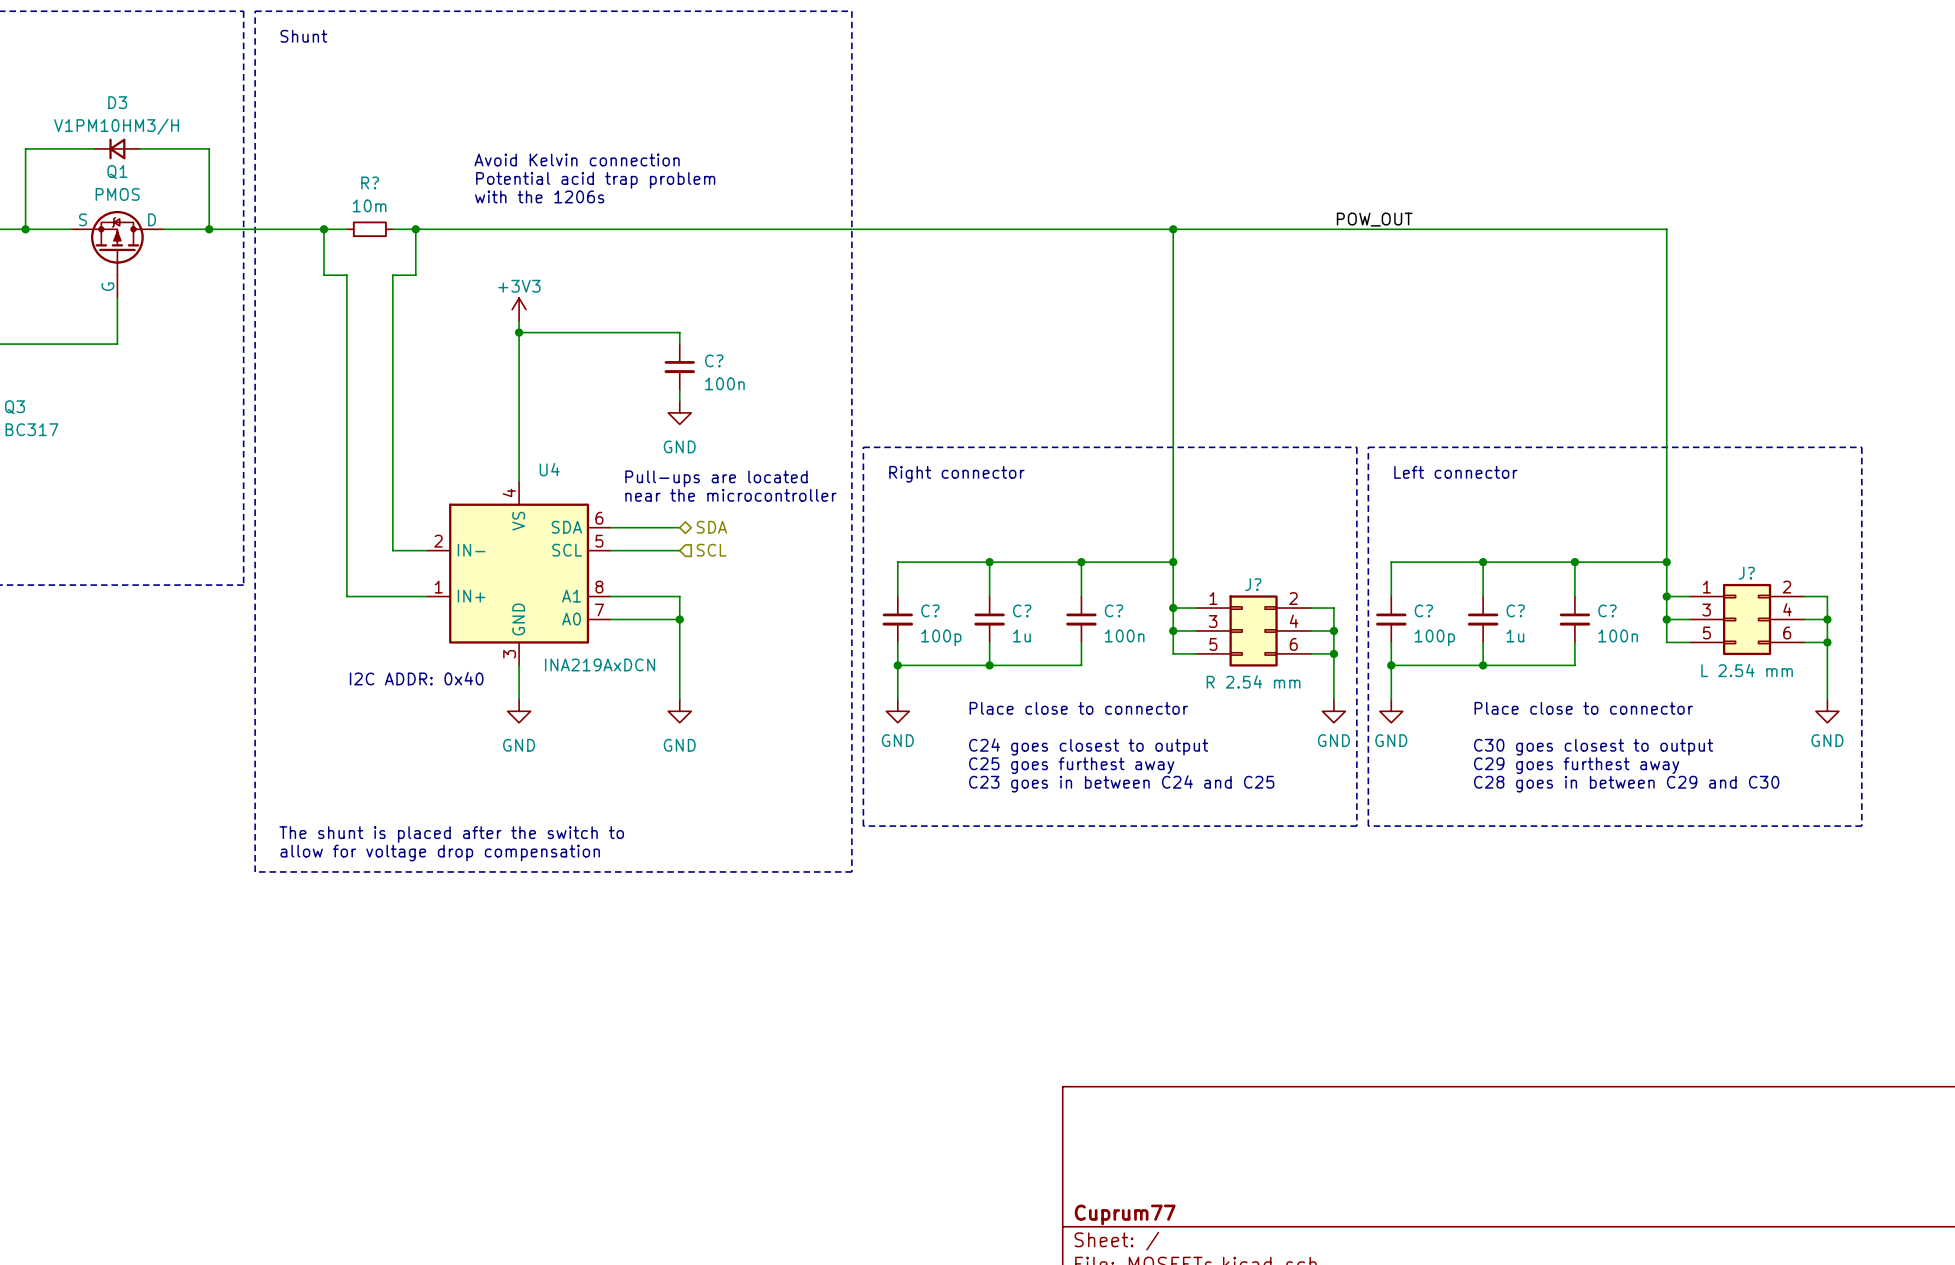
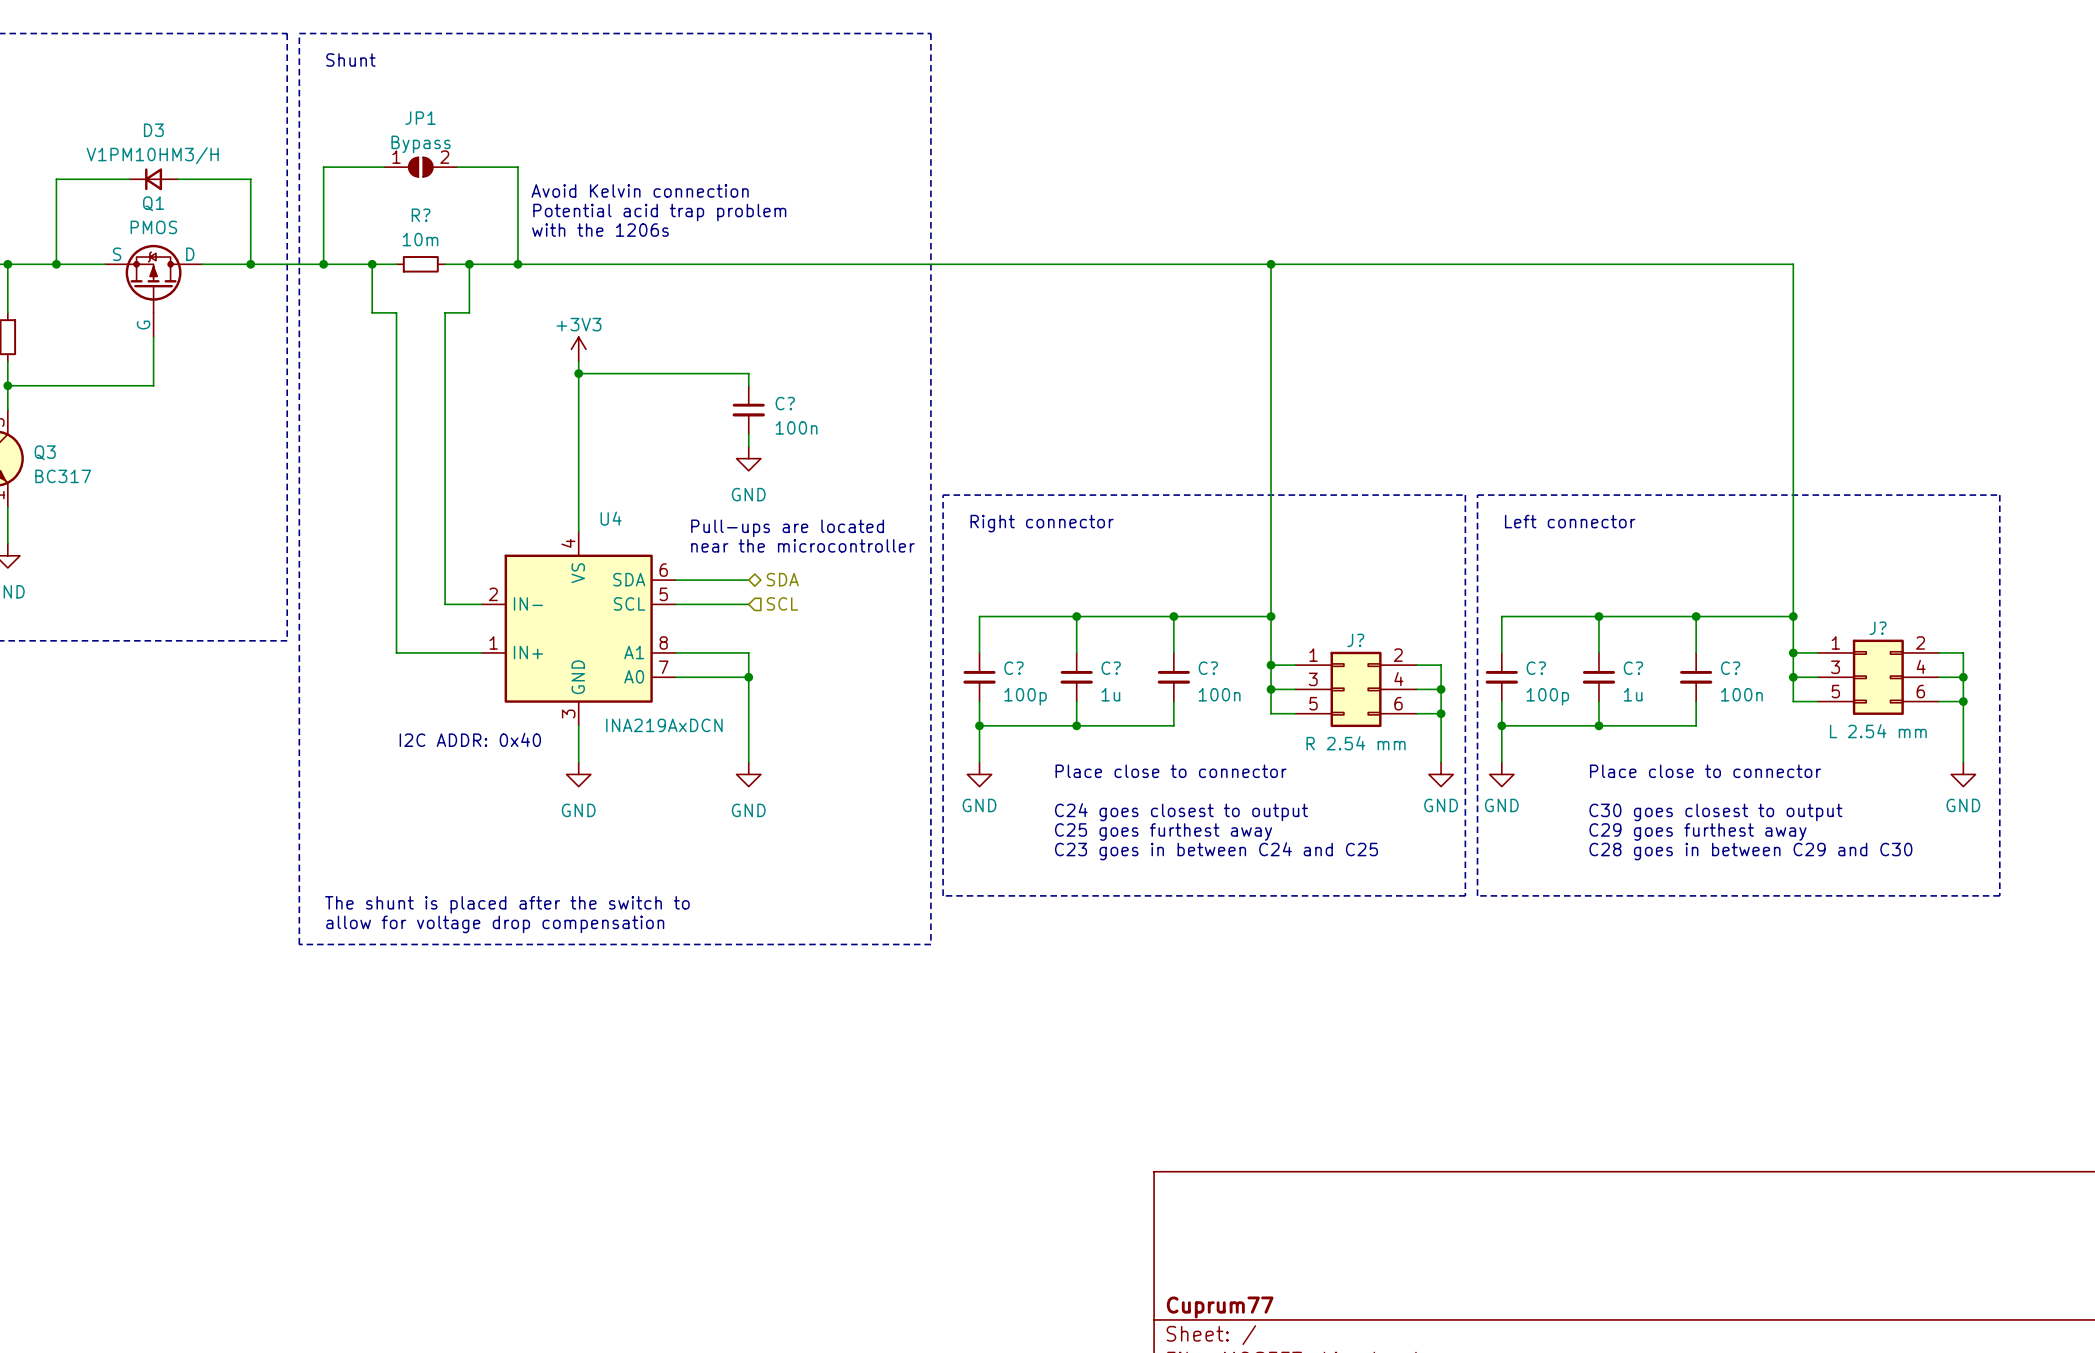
wire: none -> (384, 167) (323, 167) (323, 264)
JP1: none -> Bypass (420, 167)
wire: none -> (457, 167) (517, 167) (517, 264)
label: POW_OUT (1374, 219) -> none
junction: none -> (323, 264)
junction: none -> (517, 264)

